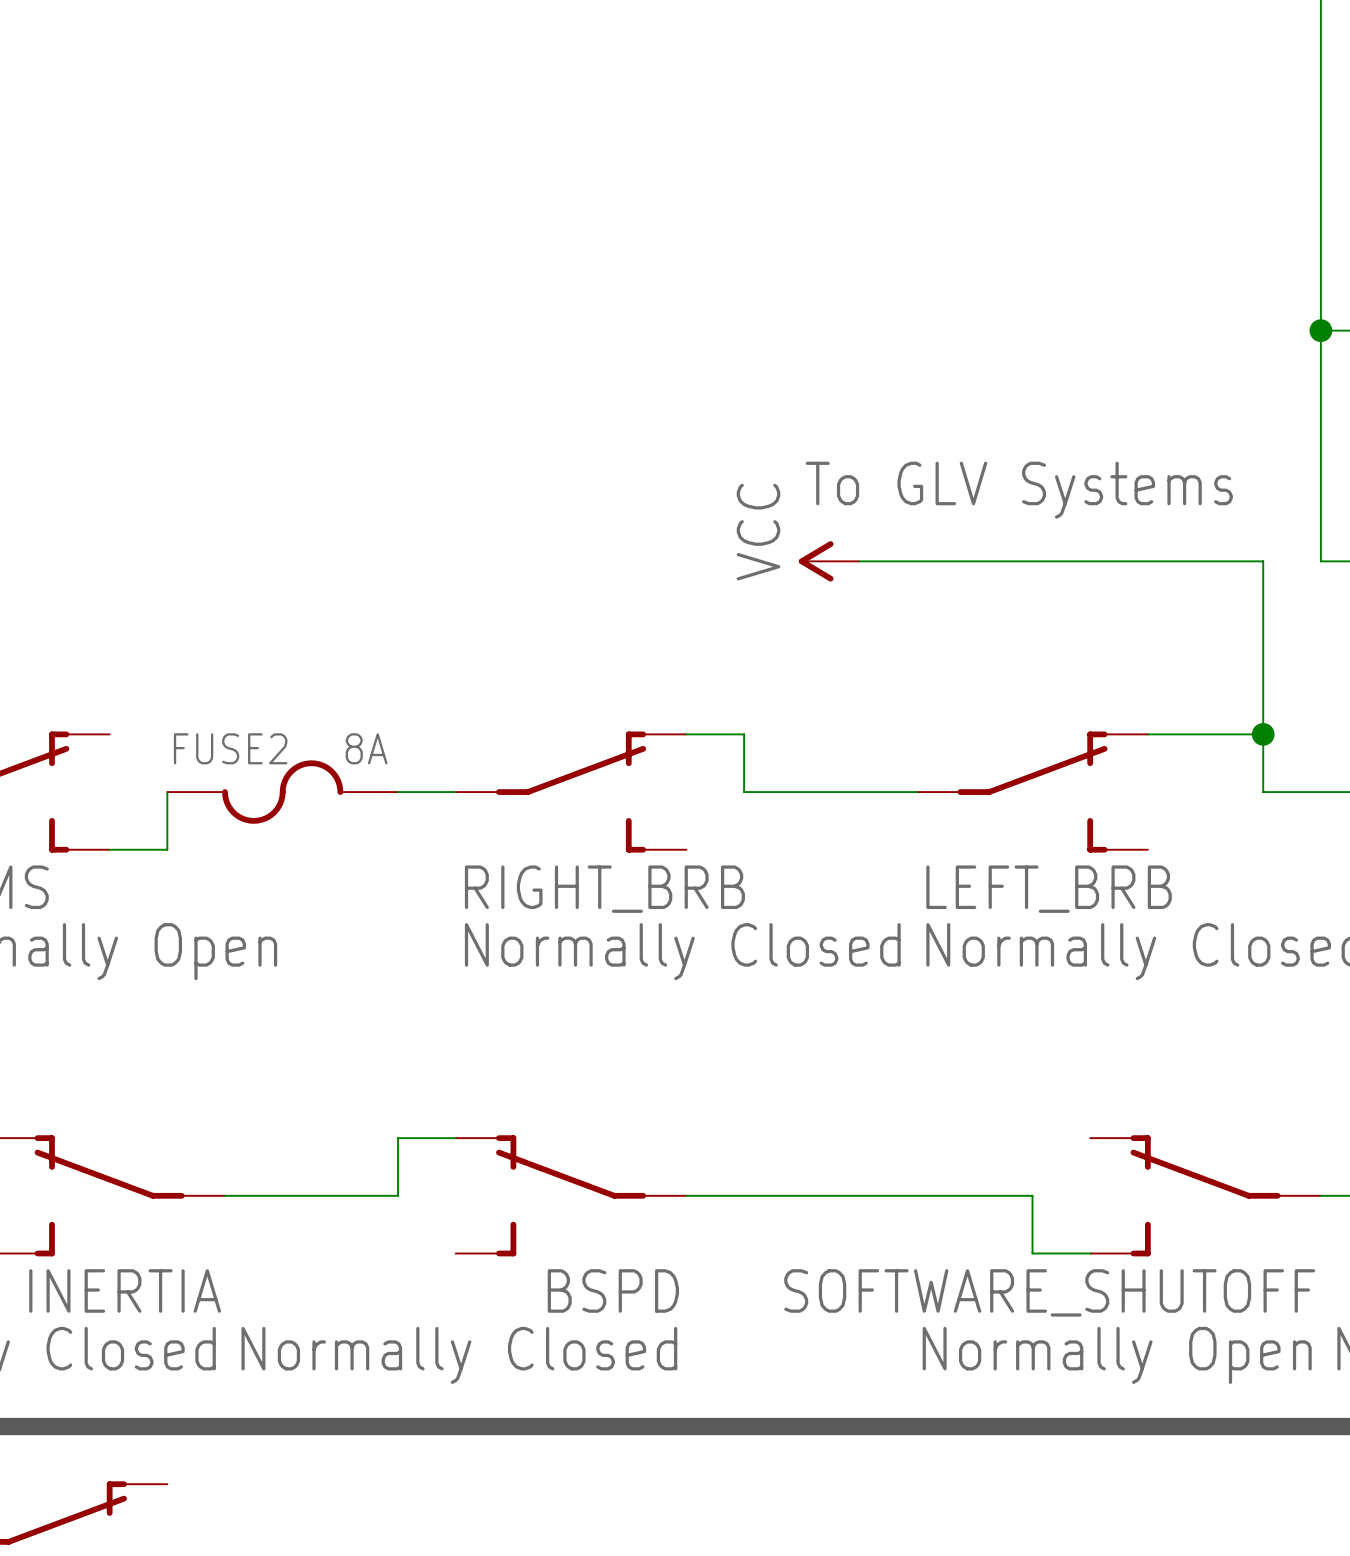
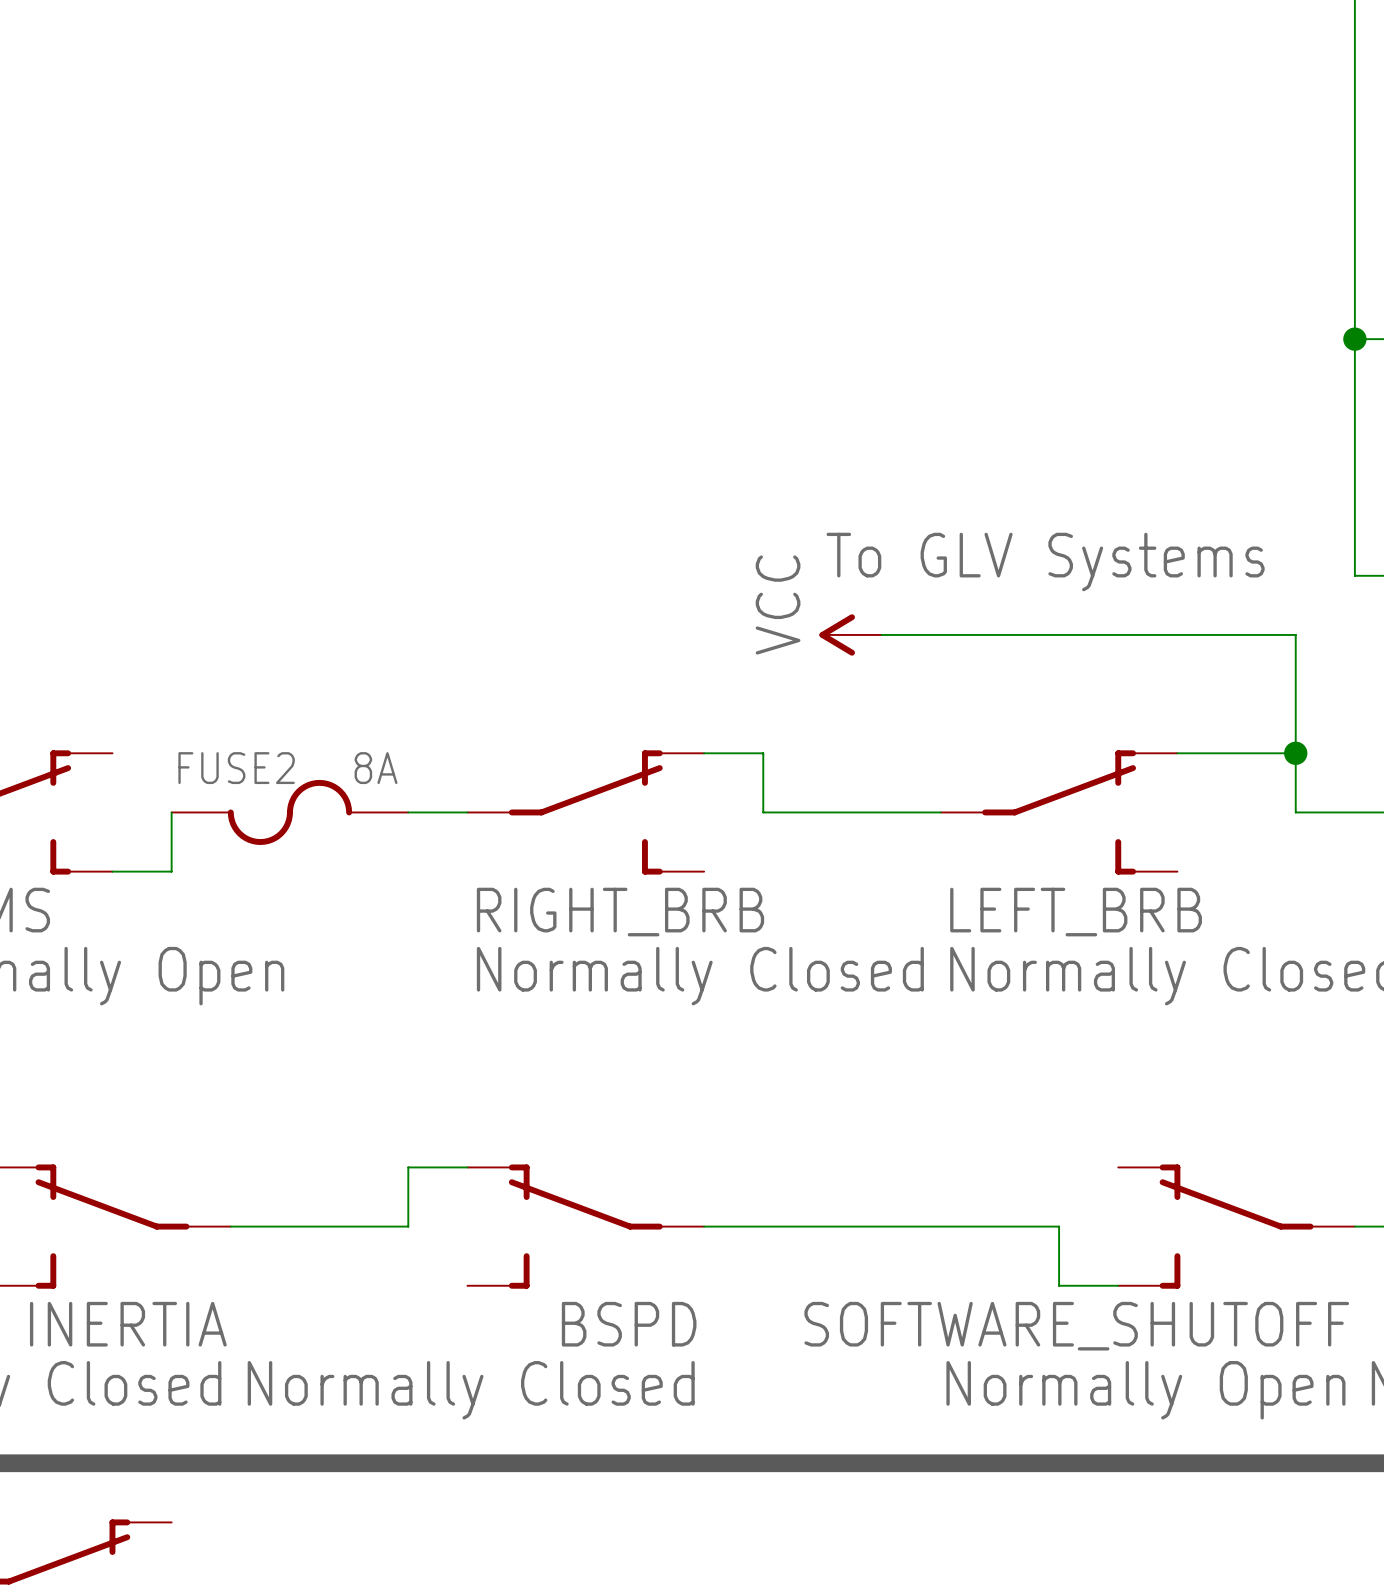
text position: To GLV Systems (1019, 490) -> To GLV Systems (1045, 562)
power symbol position: VCC (829, 561) -> VCC (850, 634)
wire: (859, 561) (1263, 561) (1263, 619) -> (881, 634) (1295, 634)

